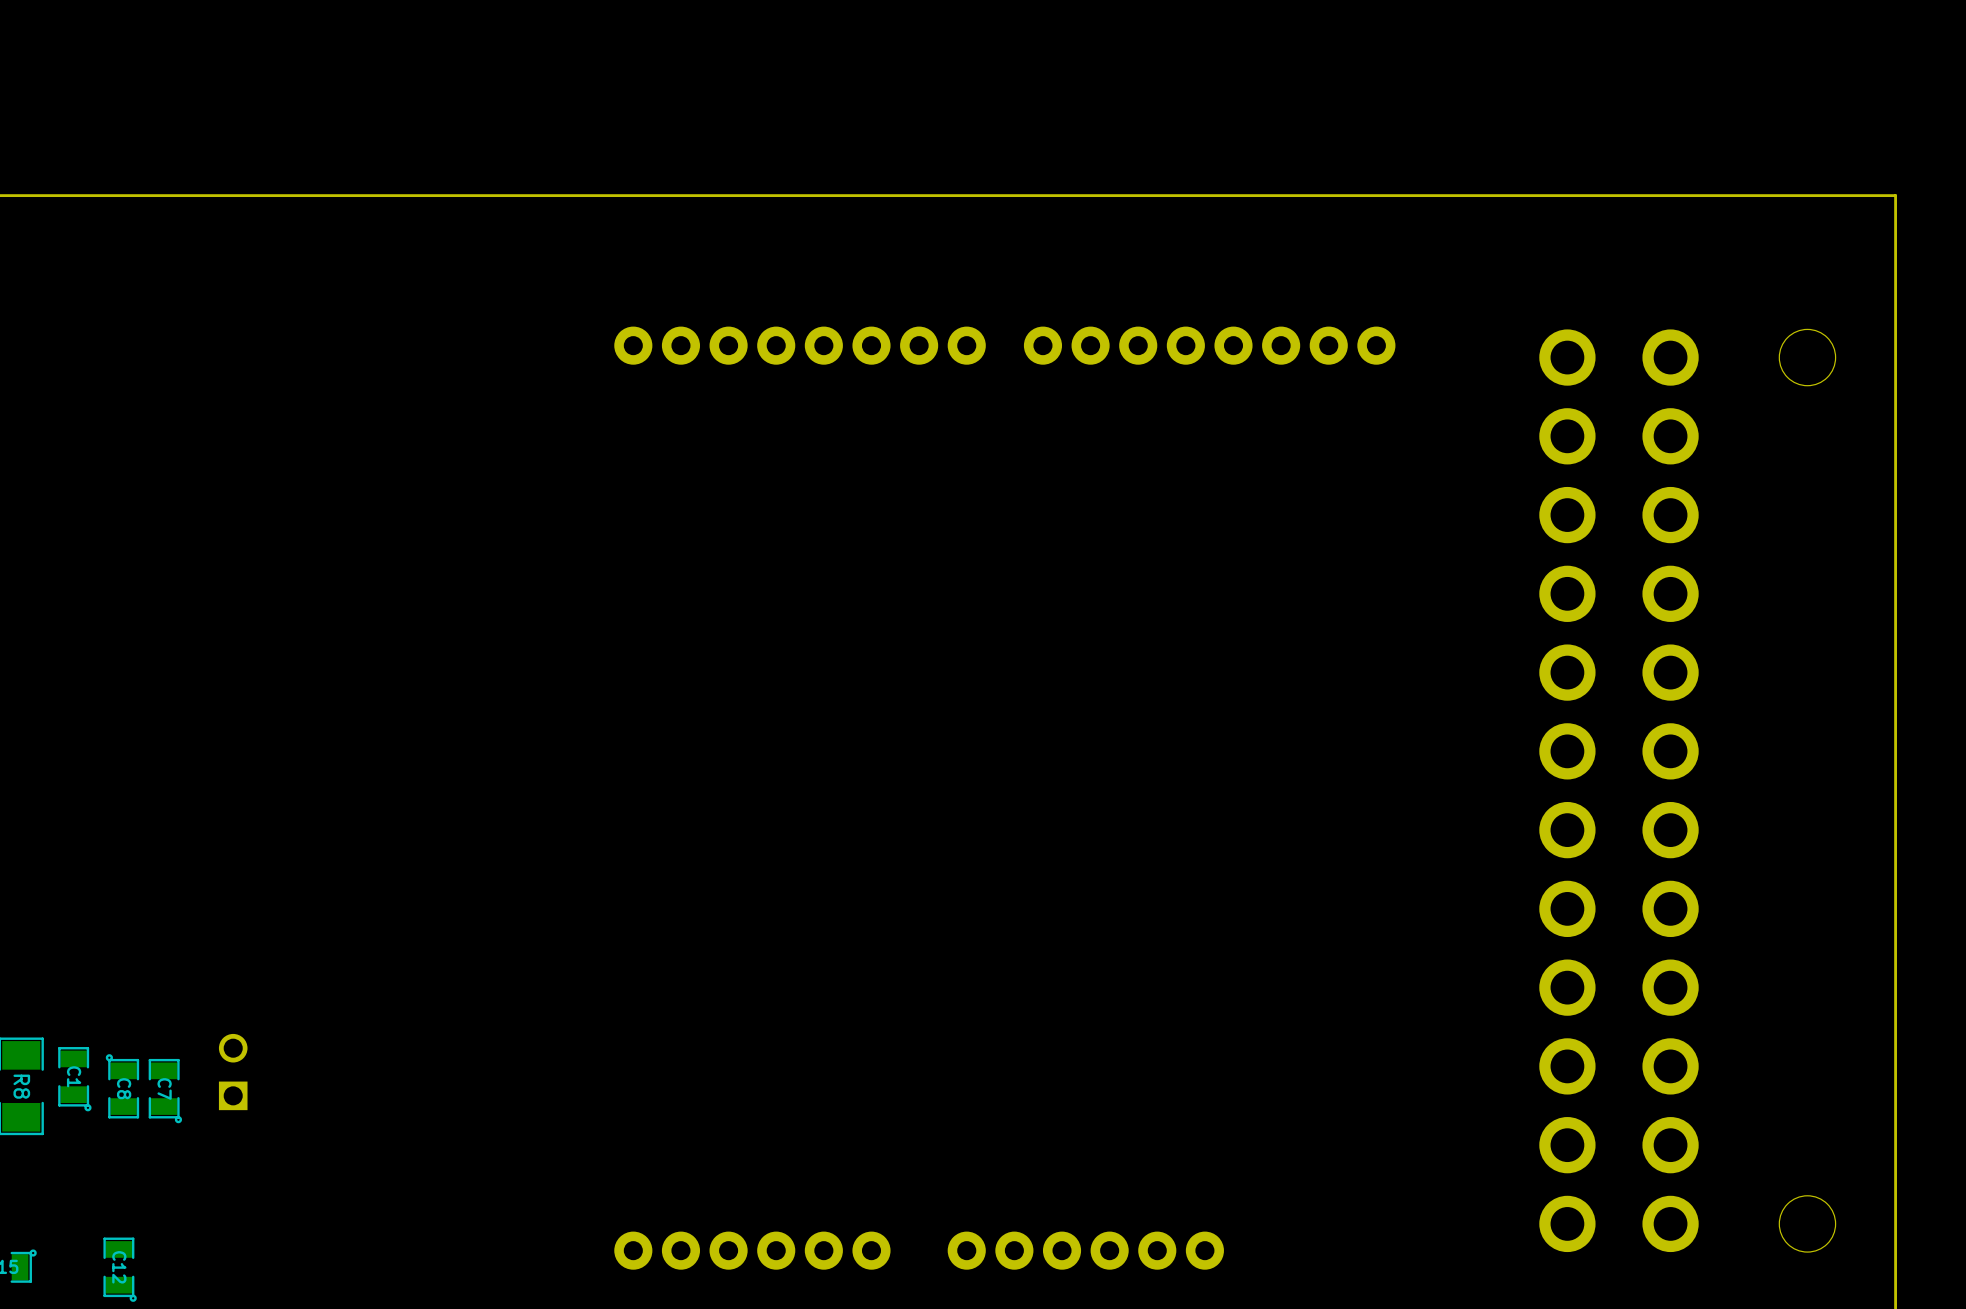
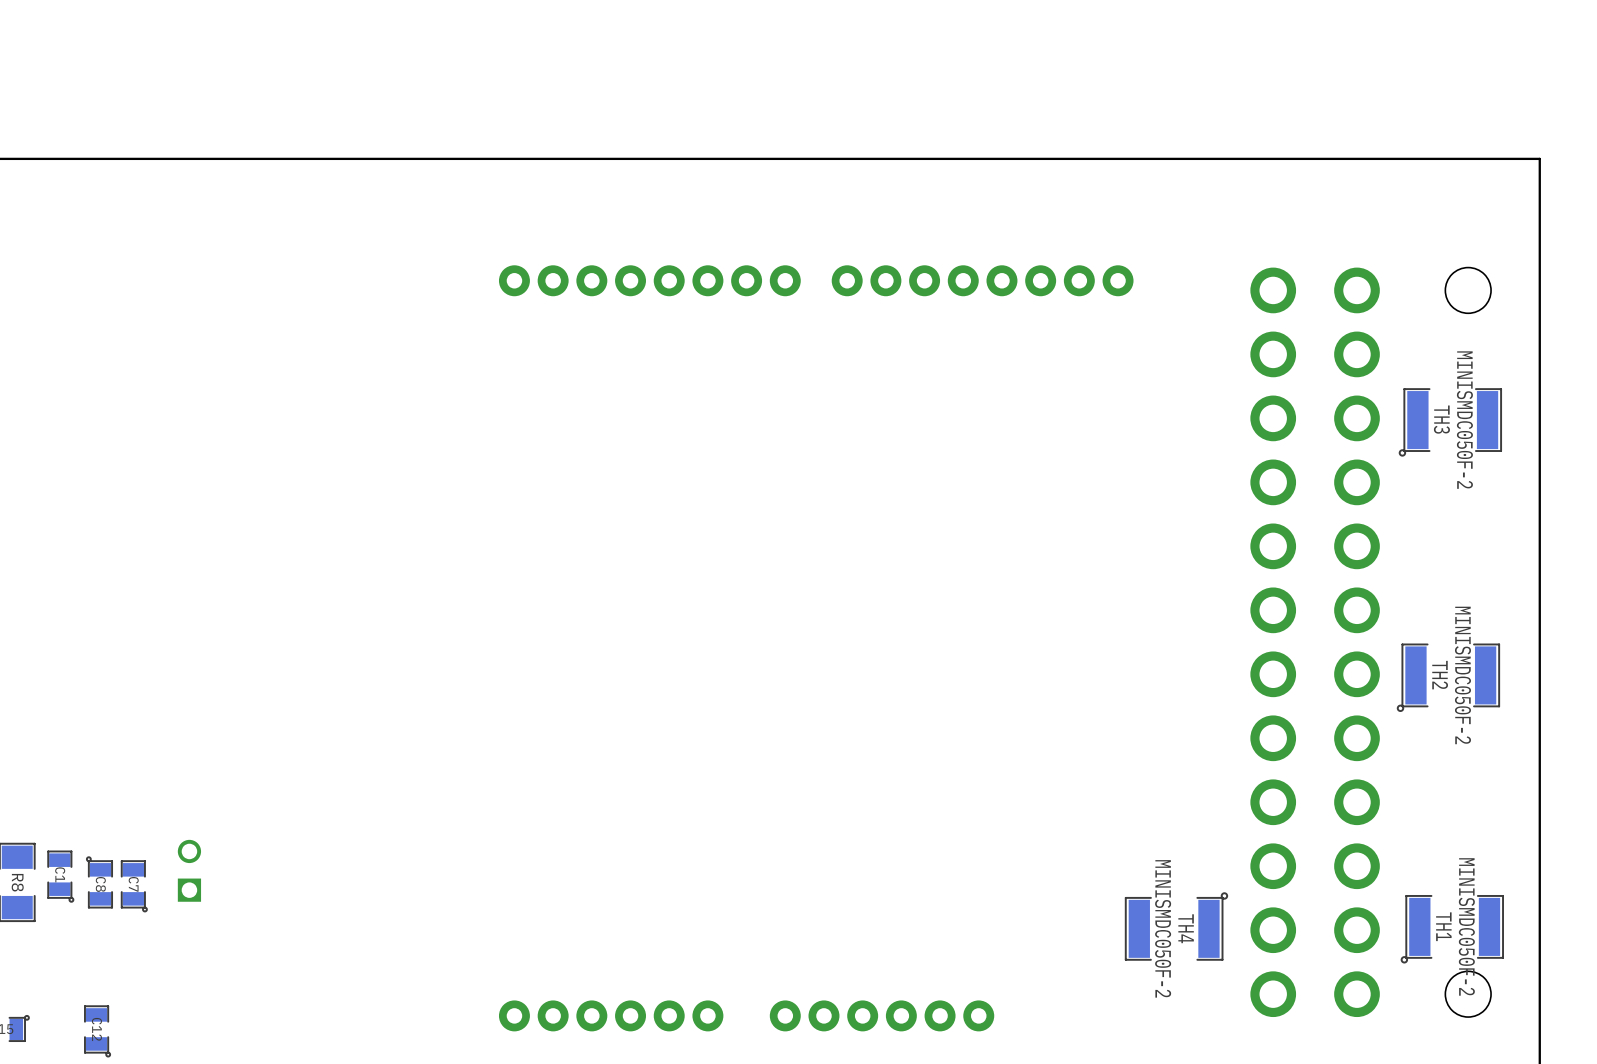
TH3: none -> MINISMDC050F-2 (1450, 422)
TH2: none -> MINISMDC050F-2 (1448, 677)
TH4: none -> MINISMDC050F-2 (1176, 926)
TH1: none -> MINISMDC050F-2 (1452, 929)

